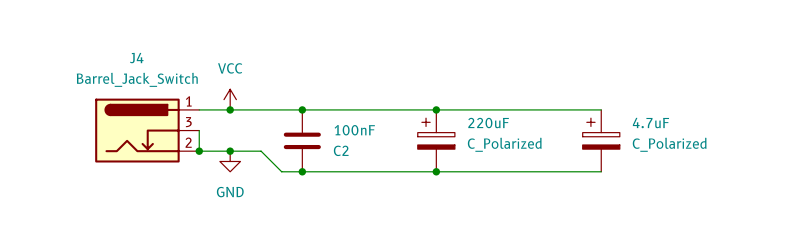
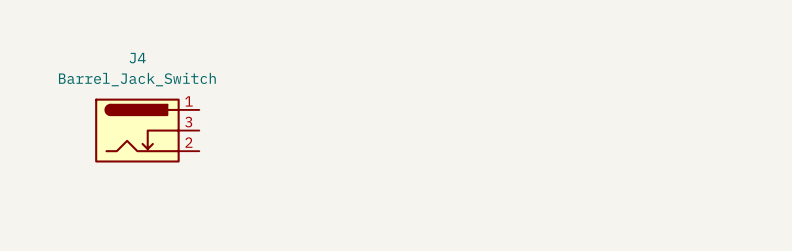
power symbol: VCC (230, 99) -> none
wire: (199, 109) (601, 109) -> none
junction: (230, 109) -> none
junction: (302, 109) -> none
junction: (436, 109) -> none
wire: (199, 130) (199, 151) (261, 151) (281, 171) (601, 171) -> none
C2: 100nF (302, 140) -> none
220uF: C_Polarized (436, 140) -> none
4.7uF: C_Polarized (601, 140) -> none
junction: (199, 151) -> none
junction: (230, 151) -> none
power symbol: GND (230, 161) -> none
junction: (302, 171) -> none
junction: (436, 171) -> none

